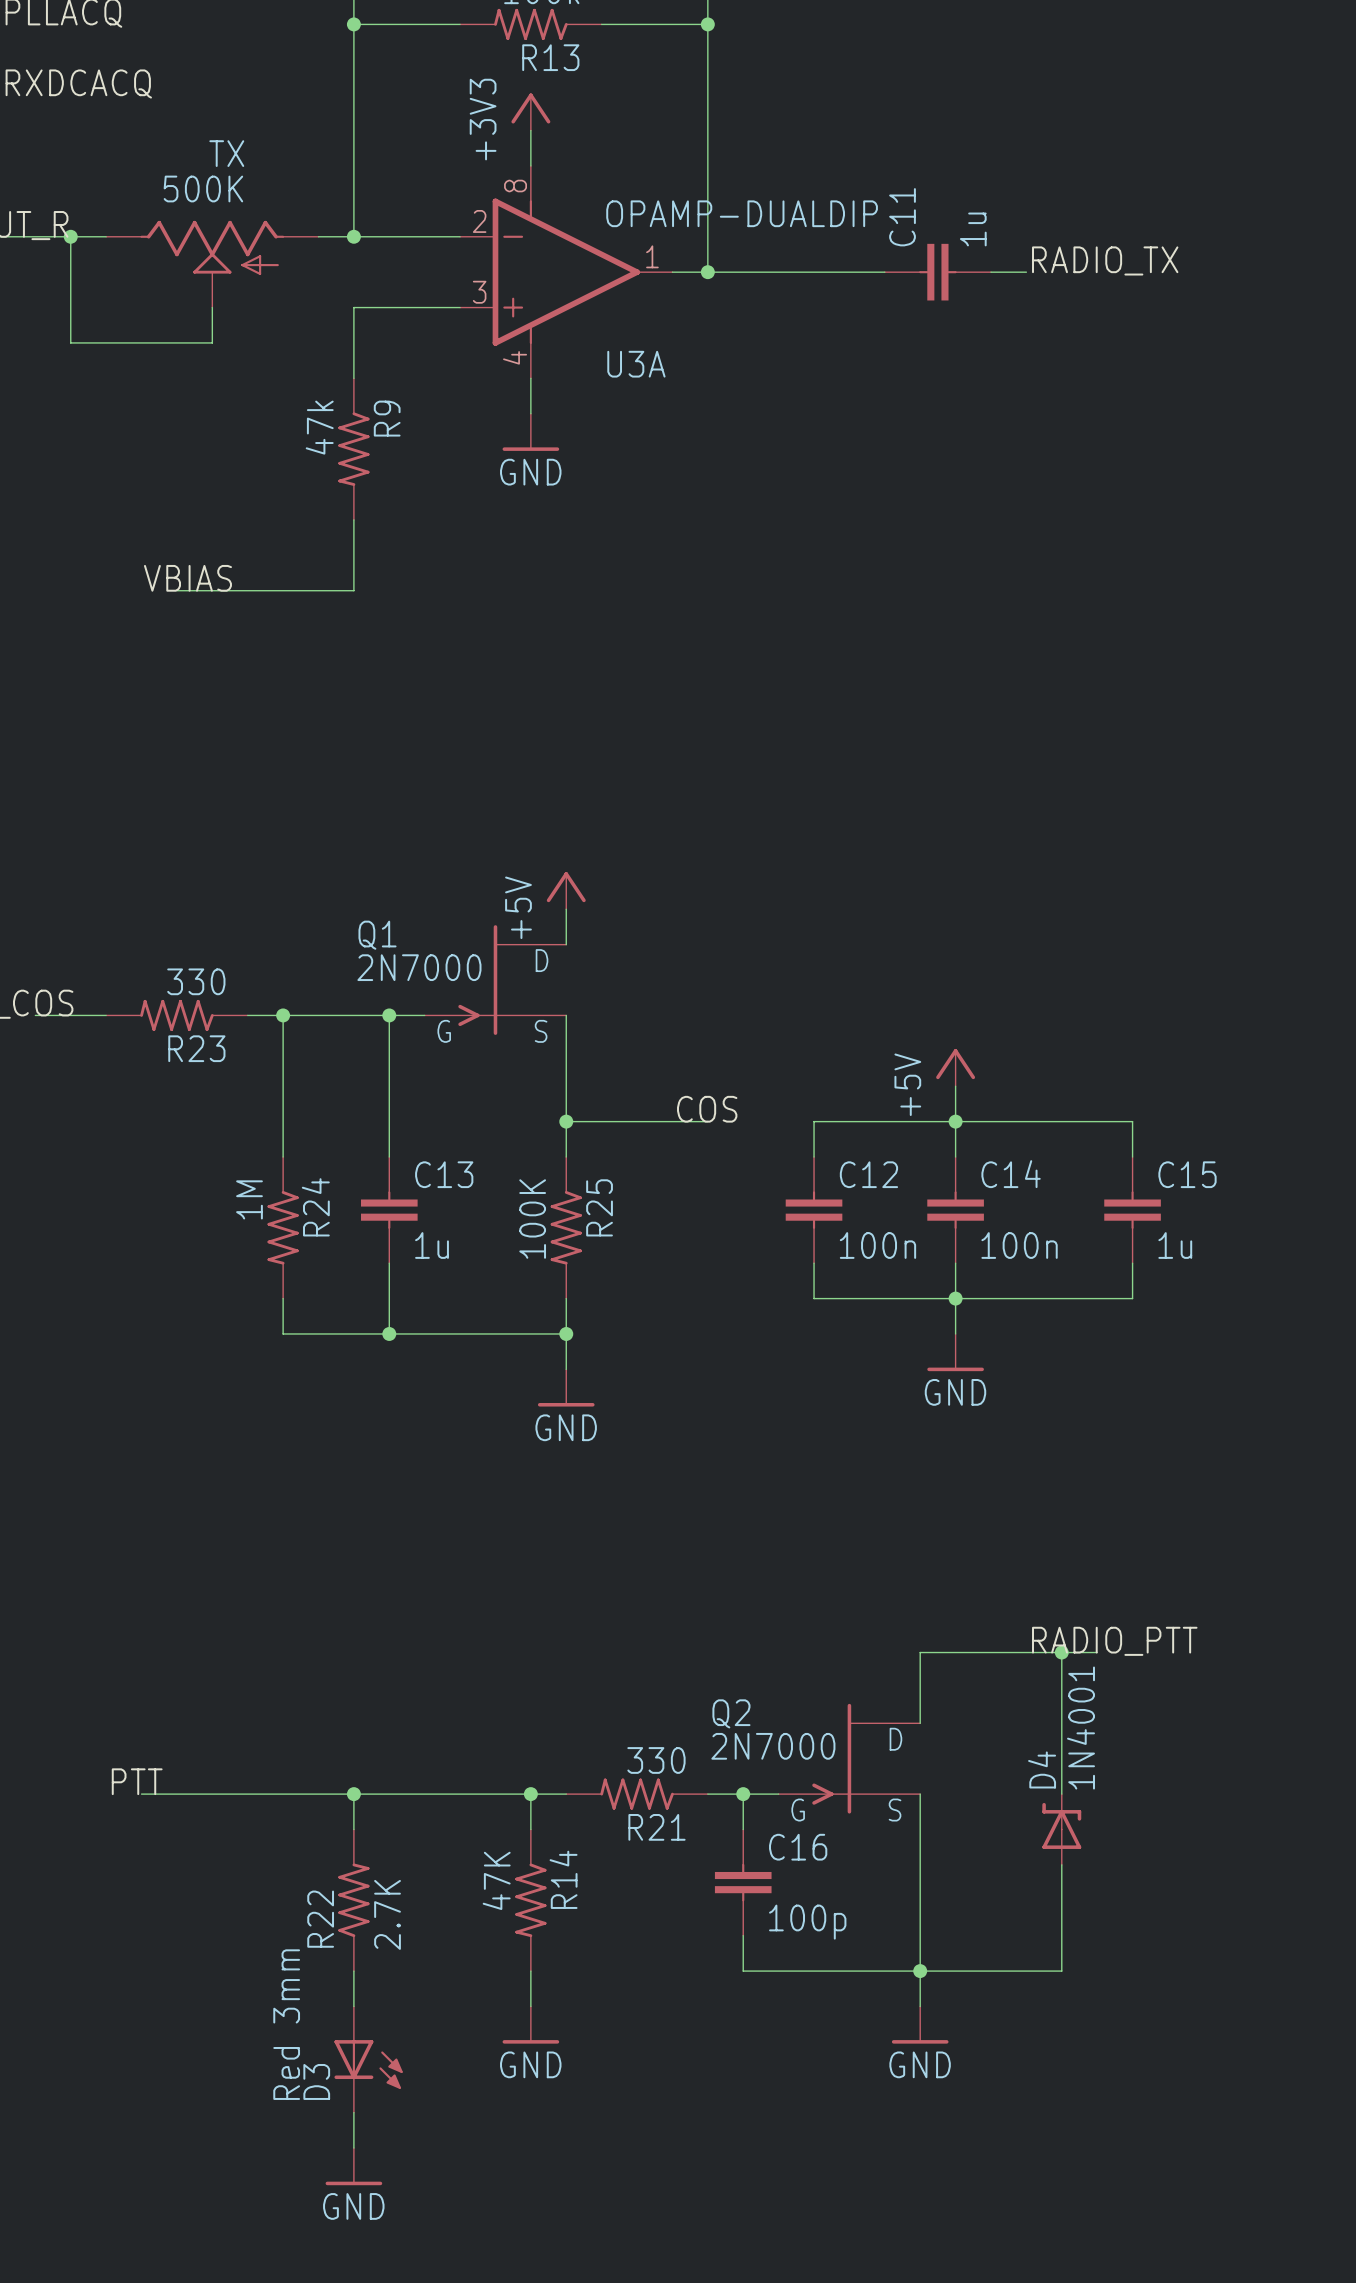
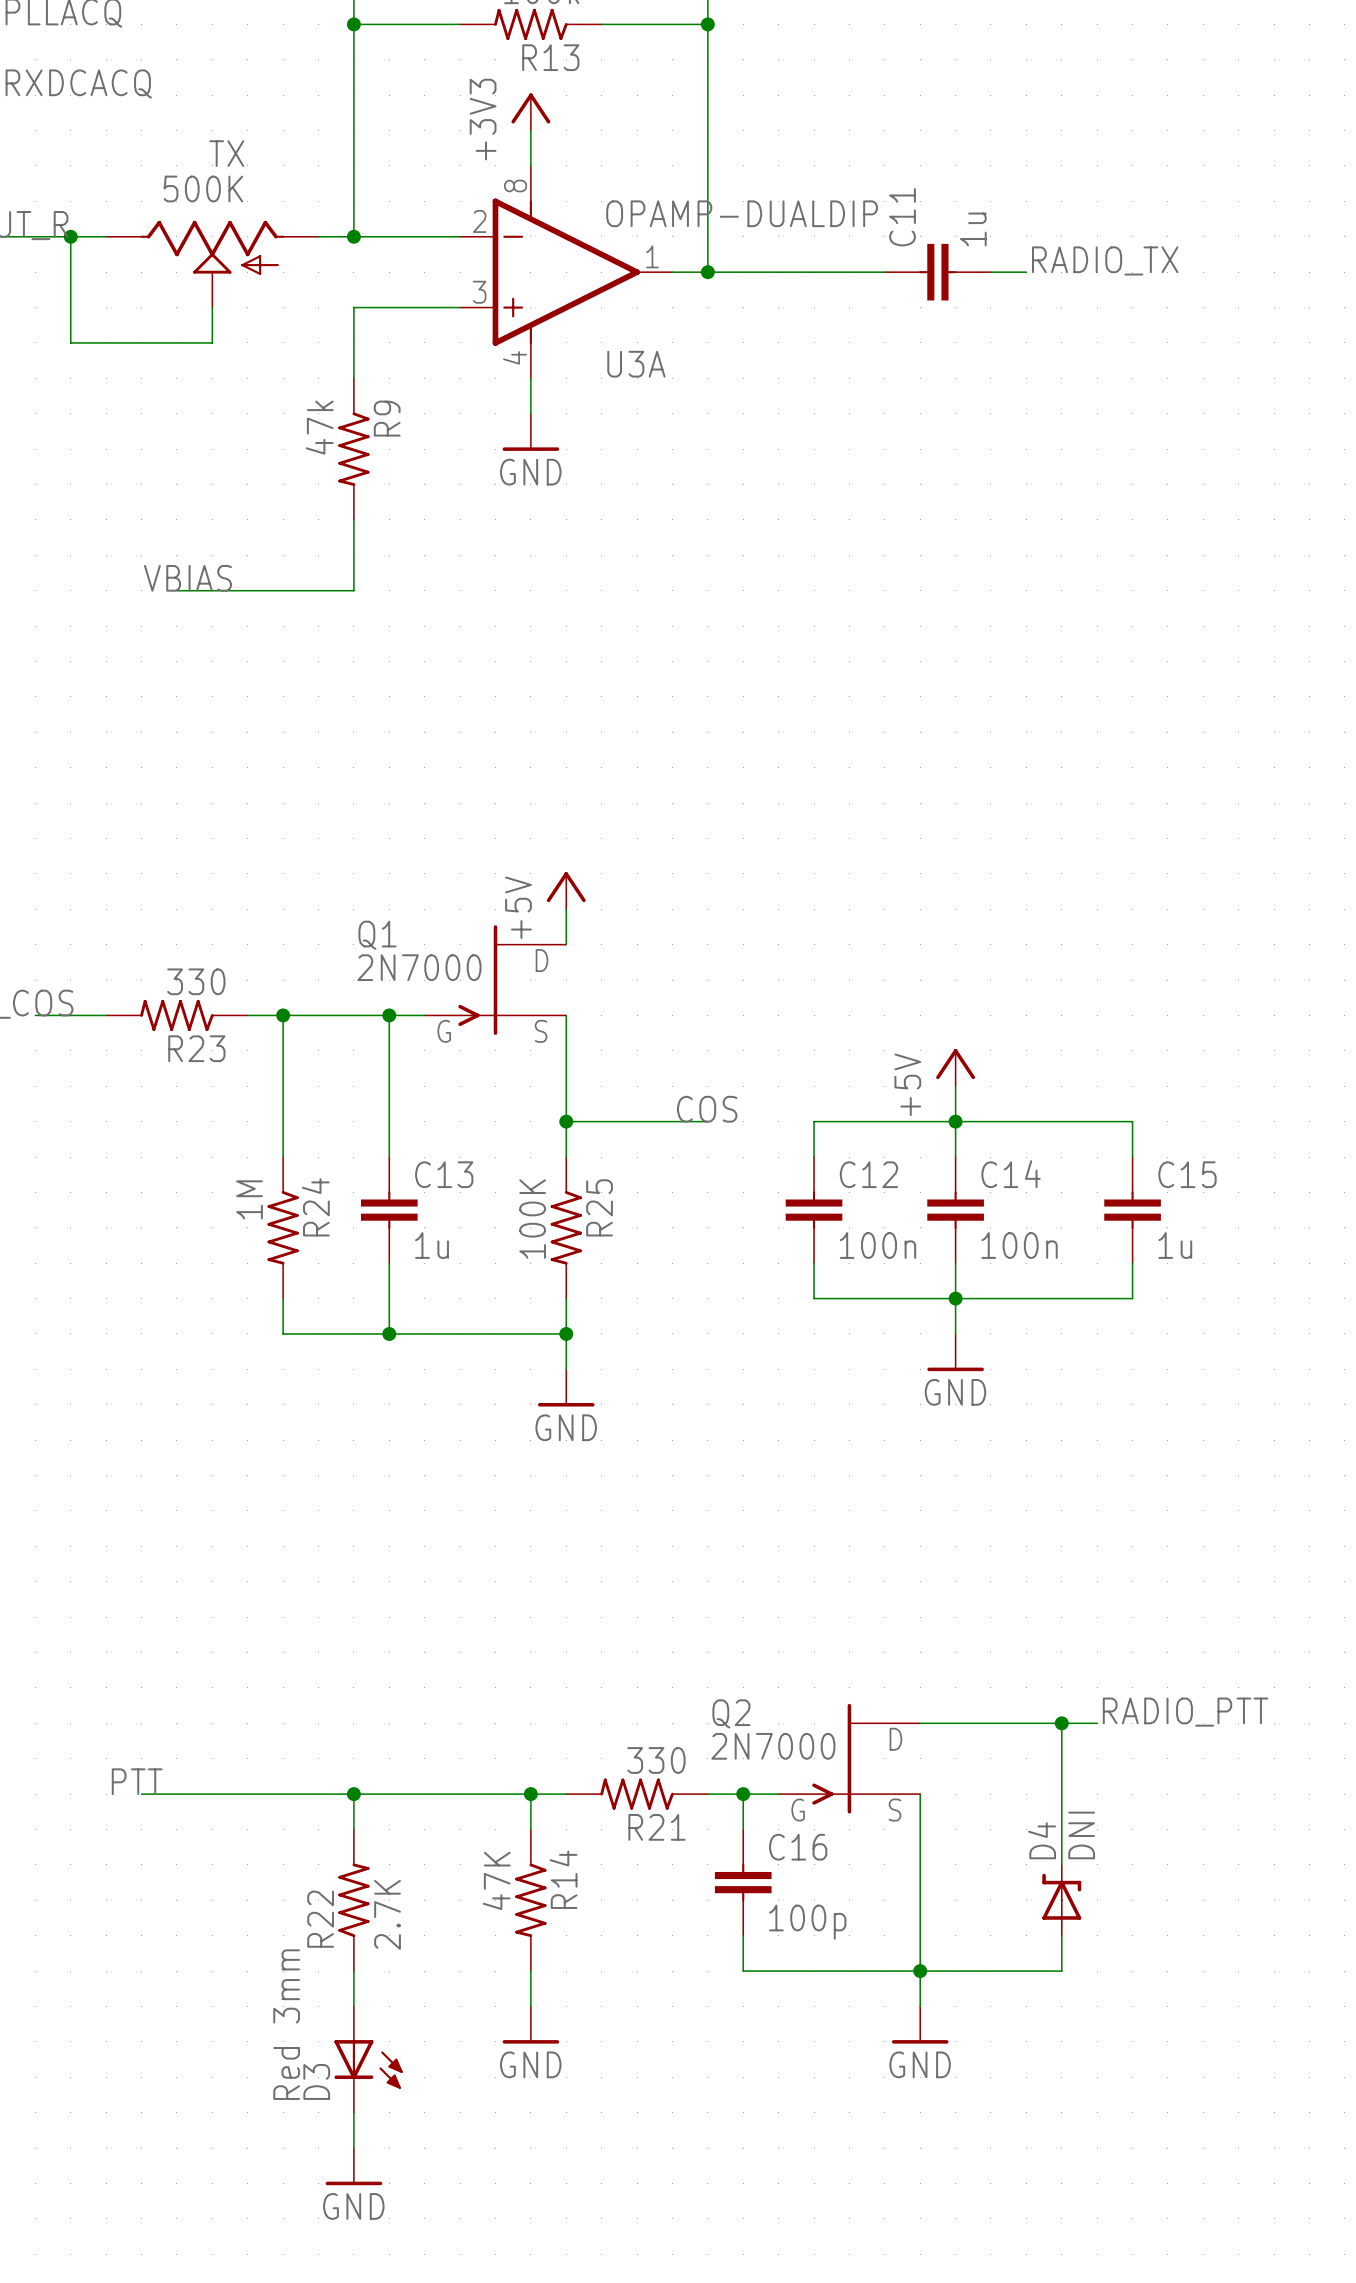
label position: RADIO_PTT (1114, 1641) -> RADIO_PTT (1185, 1712)
wire: (1061, 1652) (1061, 1723) -> none
junction position: (1061, 1652) -> (1061, 1723)
wire: (1097, 1652) (920, 1652) (920, 1723) -> (1097, 1723) (920, 1723)
D4 value: 1N4001 (1081, 1728) -> DNI (1081, 1835)
D4 position: (1061, 1829) -> (1061, 1900)

